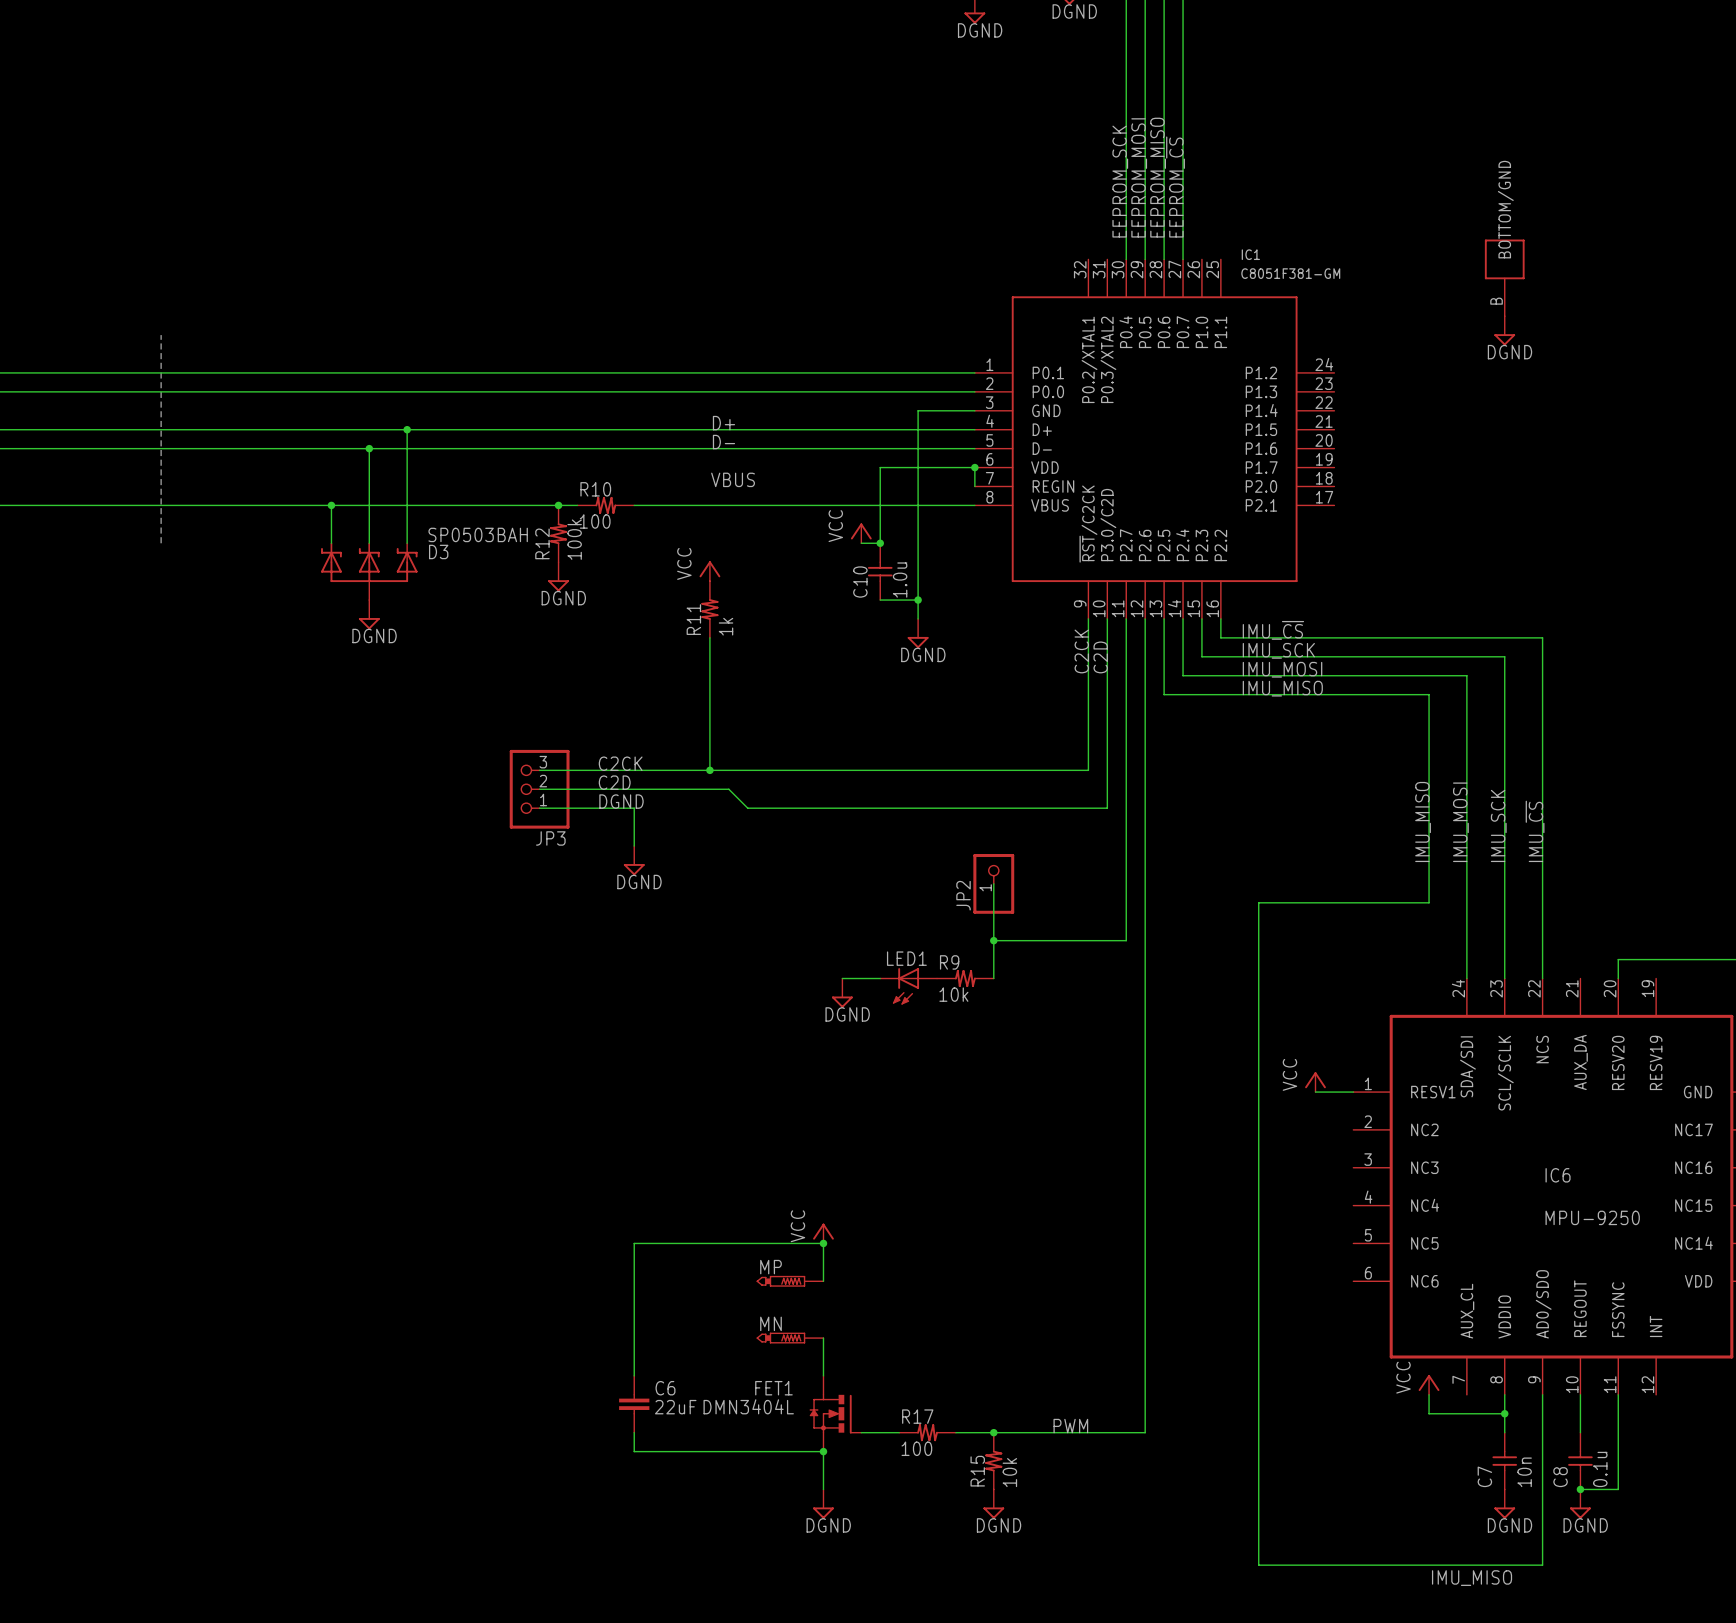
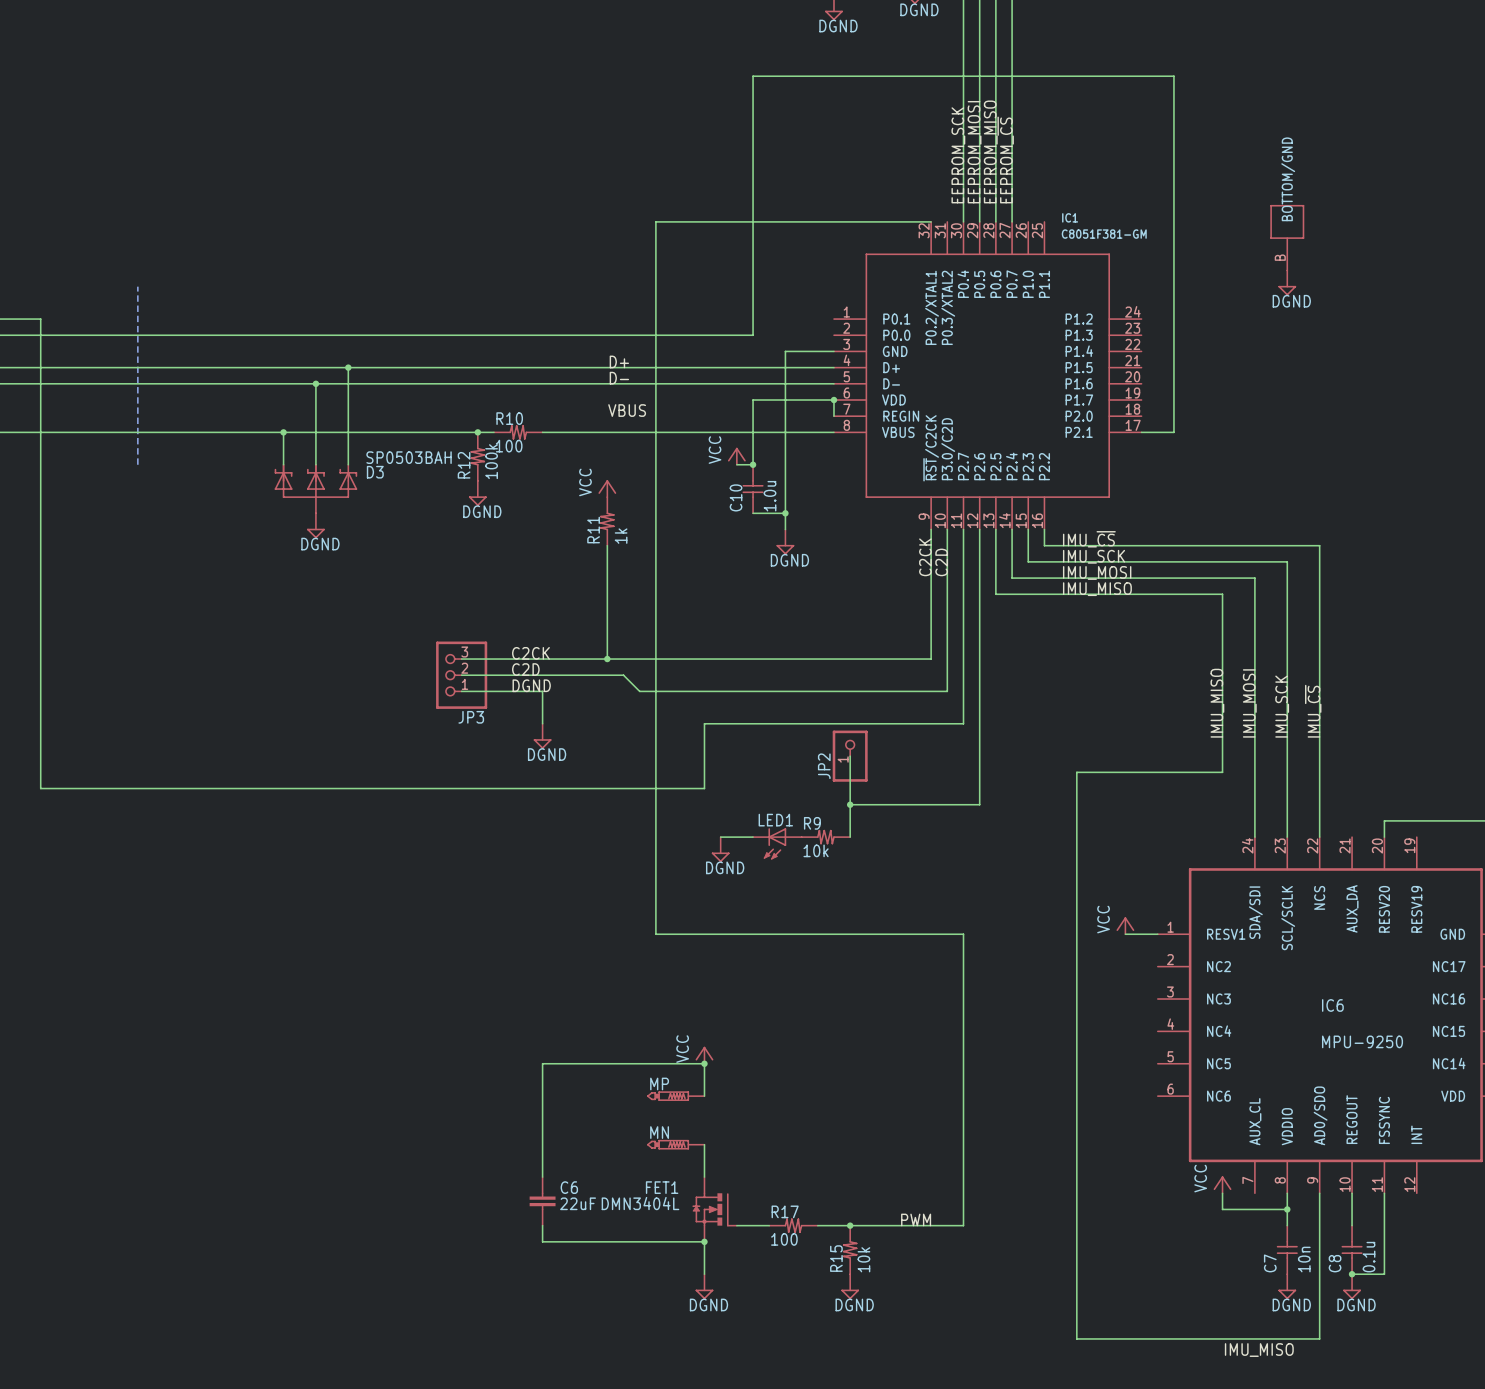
wire: (47, 372) (974, 372) -> (40, 319) (40, 788) (704, 788) (704, 723) (963, 723)
wire: (880, 391) (974, 391) -> (753, 335) (753, 76) (1173, 76) (1173, 432) (1141, 432)
wire: (1126, 846) (1126, 940) -> (979, 804) (963, 804)
wire: (1145, 940) (1145, 1432) (1126, 1432) -> (931, 221) (655, 221) (655, 934) (963, 934) (963, 1225)

